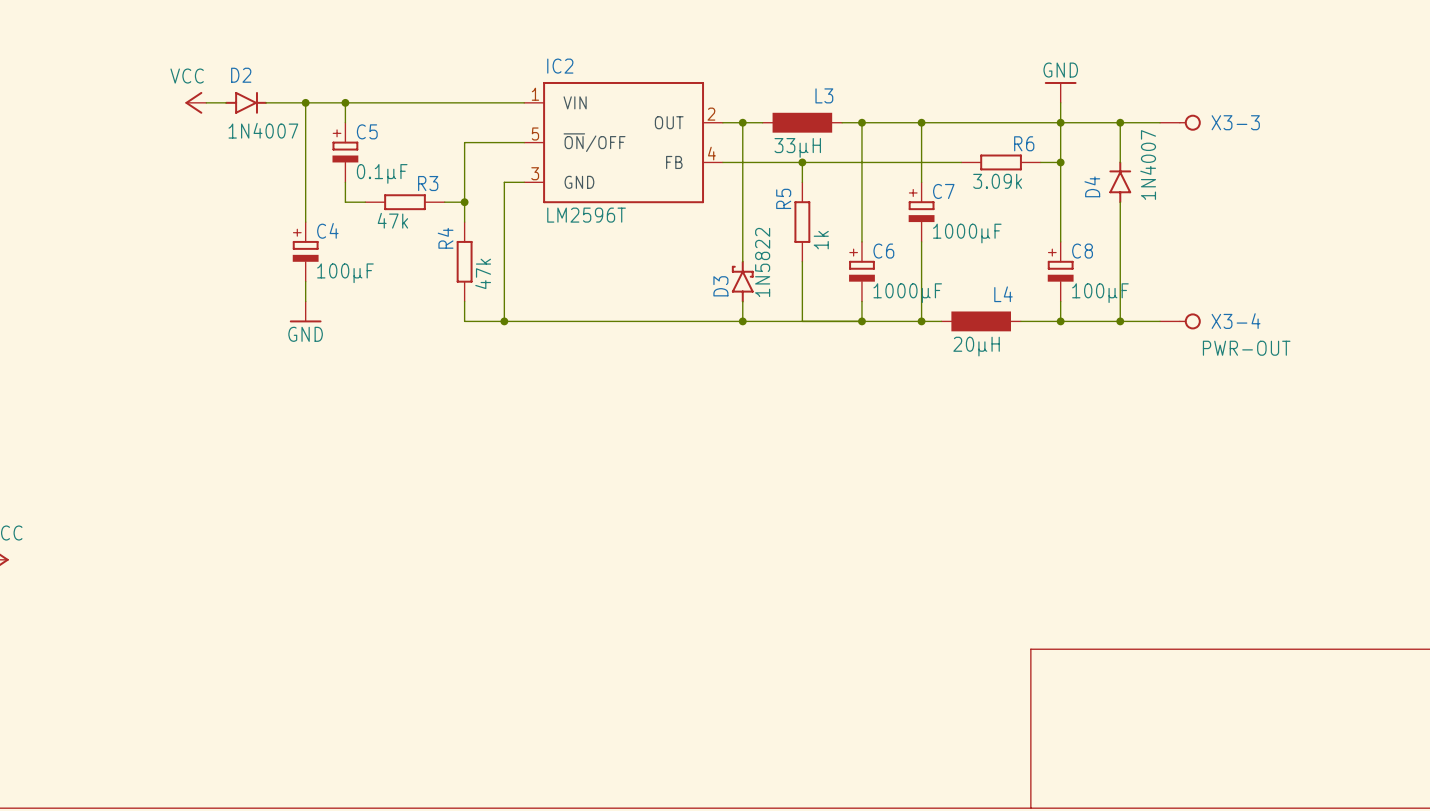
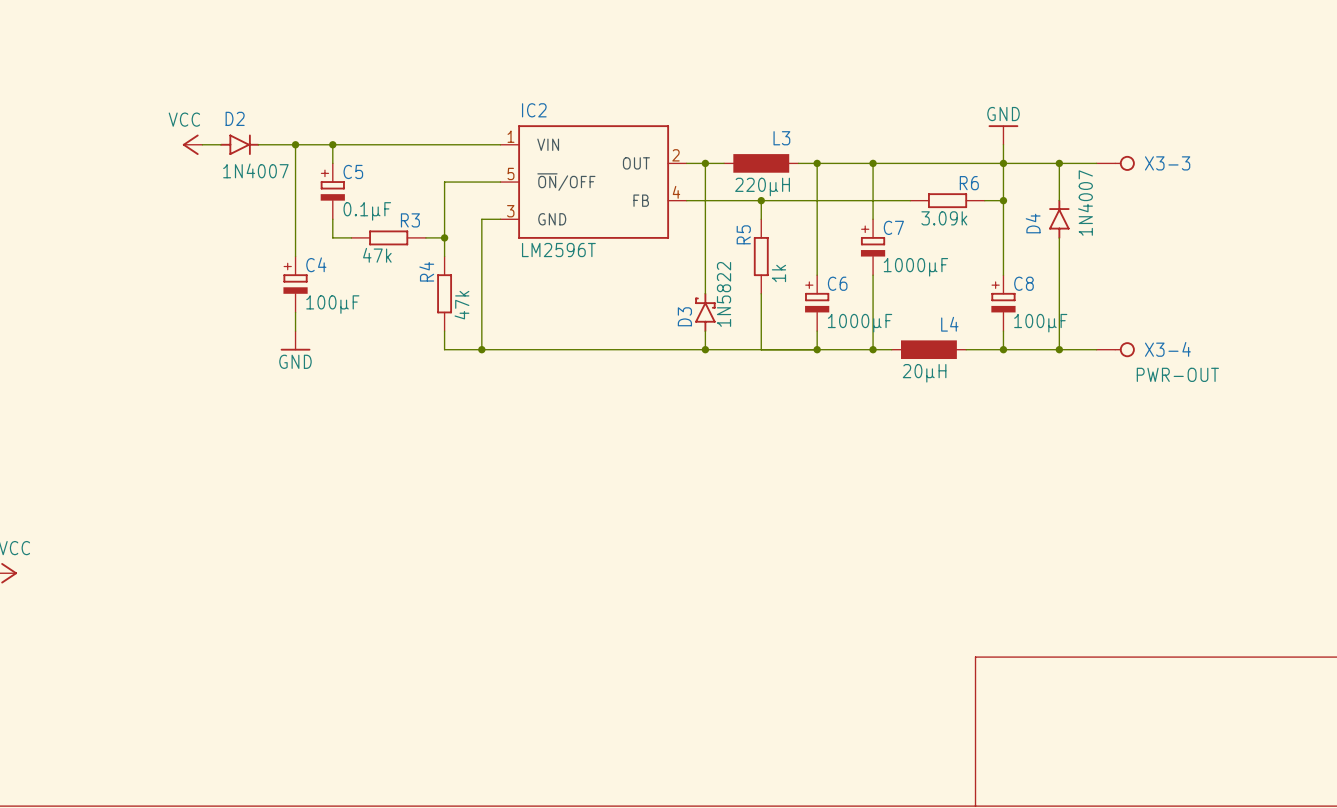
L3 value: 33µH (797, 147) -> 220µH (762, 187)

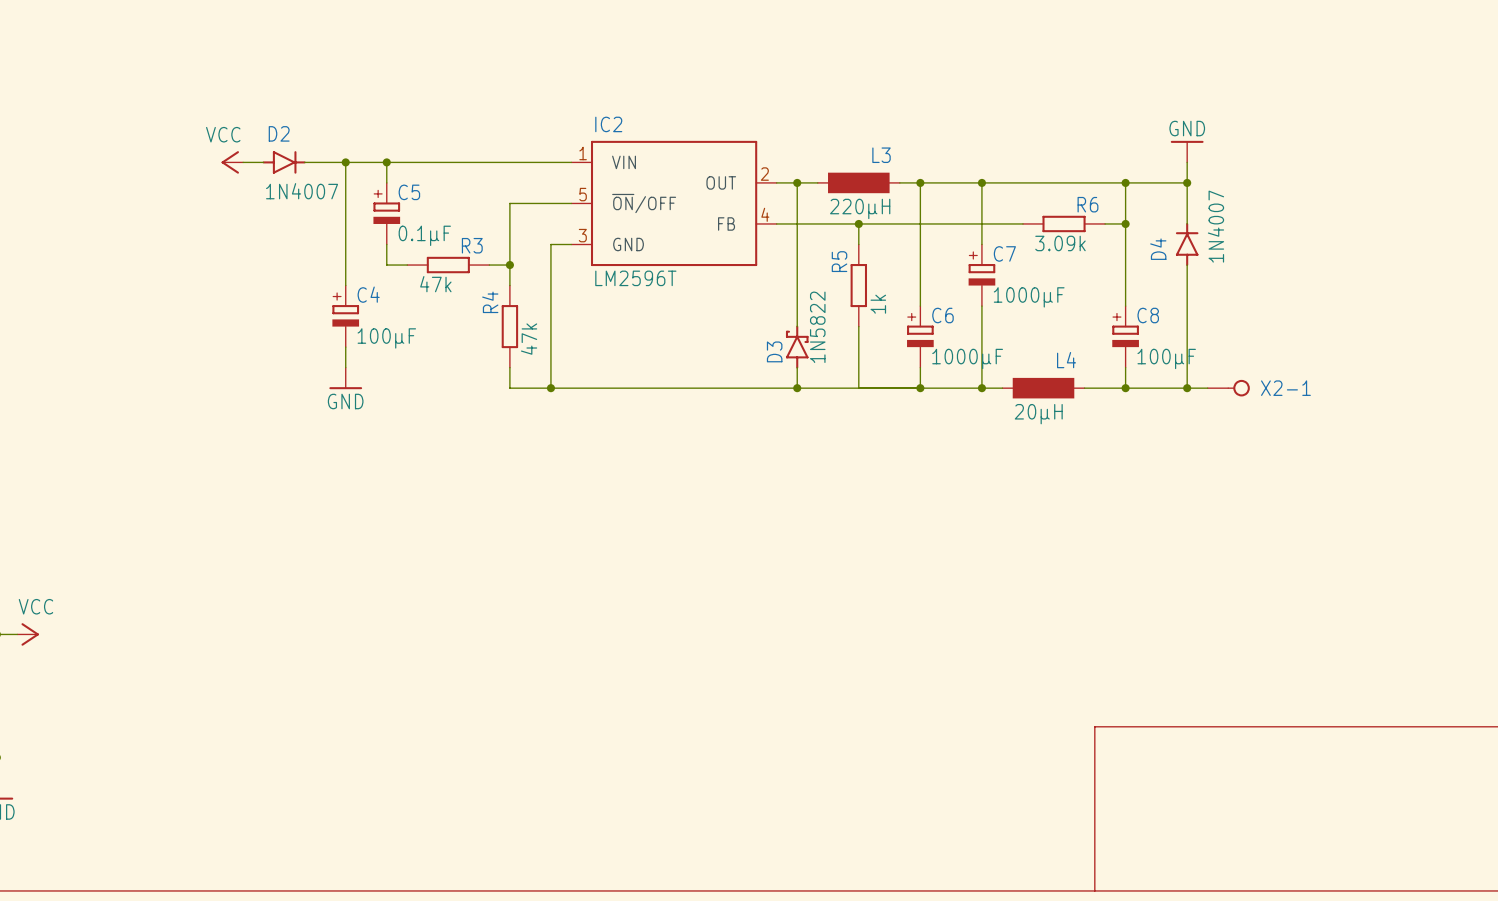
power symbol position: GND (1003, 134) -> GND (1187, 151)
wire: (1003, 144) (1003, 163) -> none
wire: (1059, 163) (1096, 163) -> (1187, 182) (1187, 162)
X3-3: (1115, 163) -> none
X2-1: none -> (1228, 388)
X3-4: PWR-OUT (1115, 349) -> none

